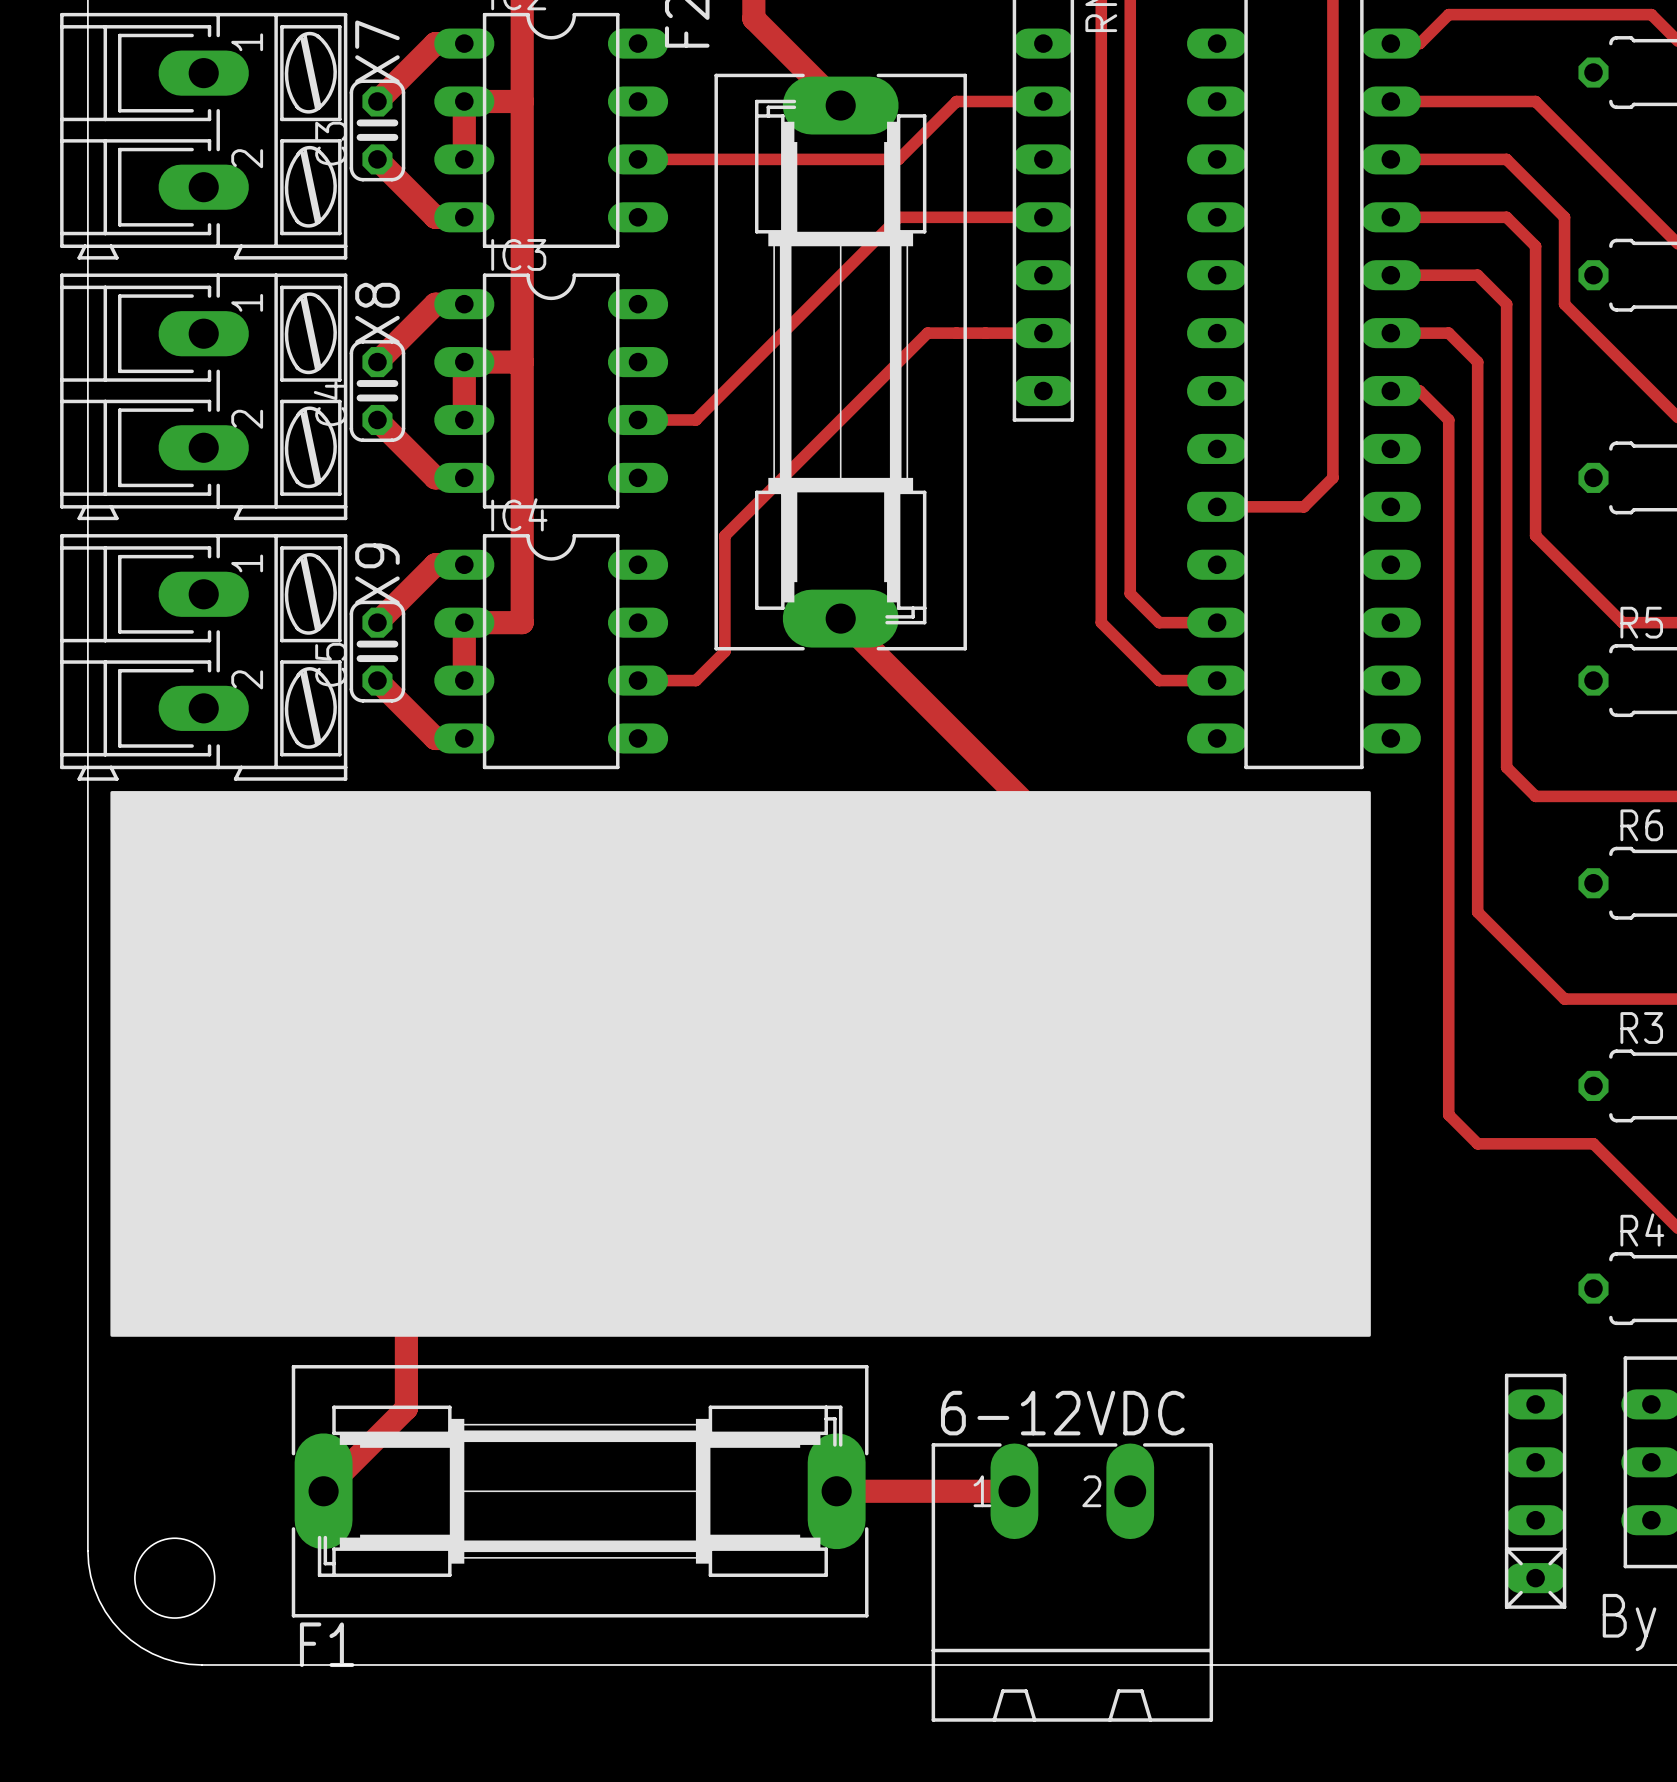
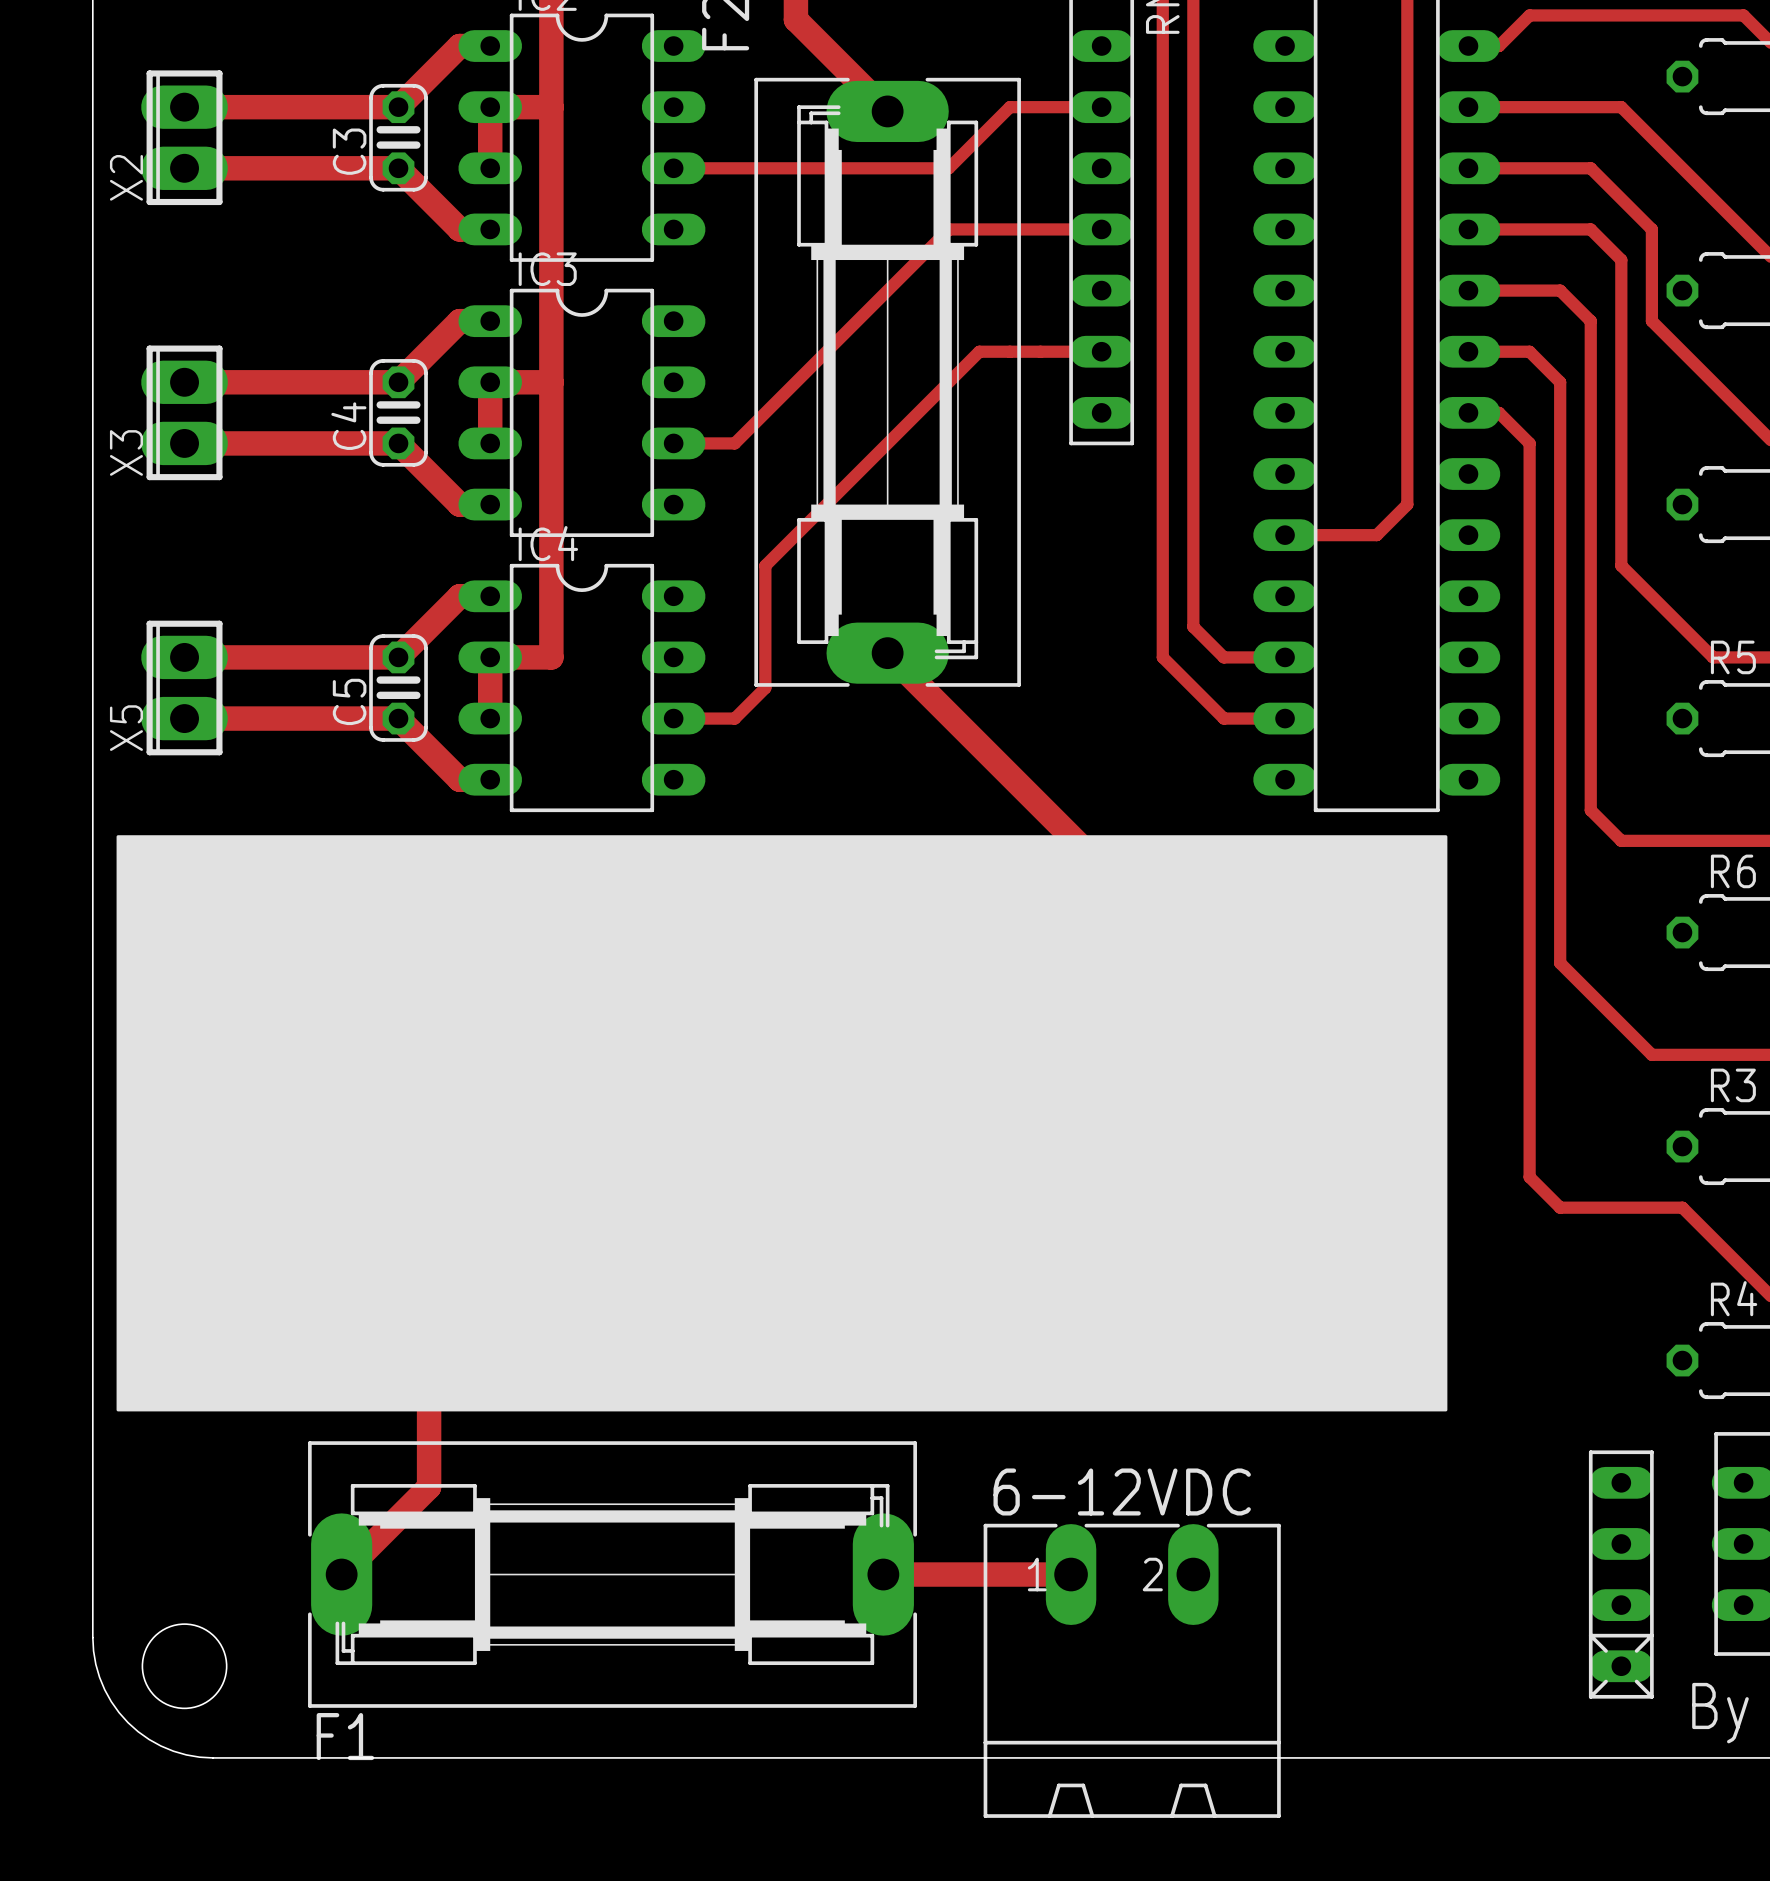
track: none -> (184, 107) (398, 107)
X2: none -> (184, 137)
X7: (203, 136) -> none
track: none -> (184, 168) (398, 168)
track: none -> (184, 382) (398, 382)
X3: none -> (184, 412)
X8: (203, 396) -> none
track: none -> (184, 443) (398, 443)
track: none -> (184, 657) (398, 657)
X5: none -> (184, 687)
X9: (203, 657) -> none
track: none -> (184, 718) (398, 718)

